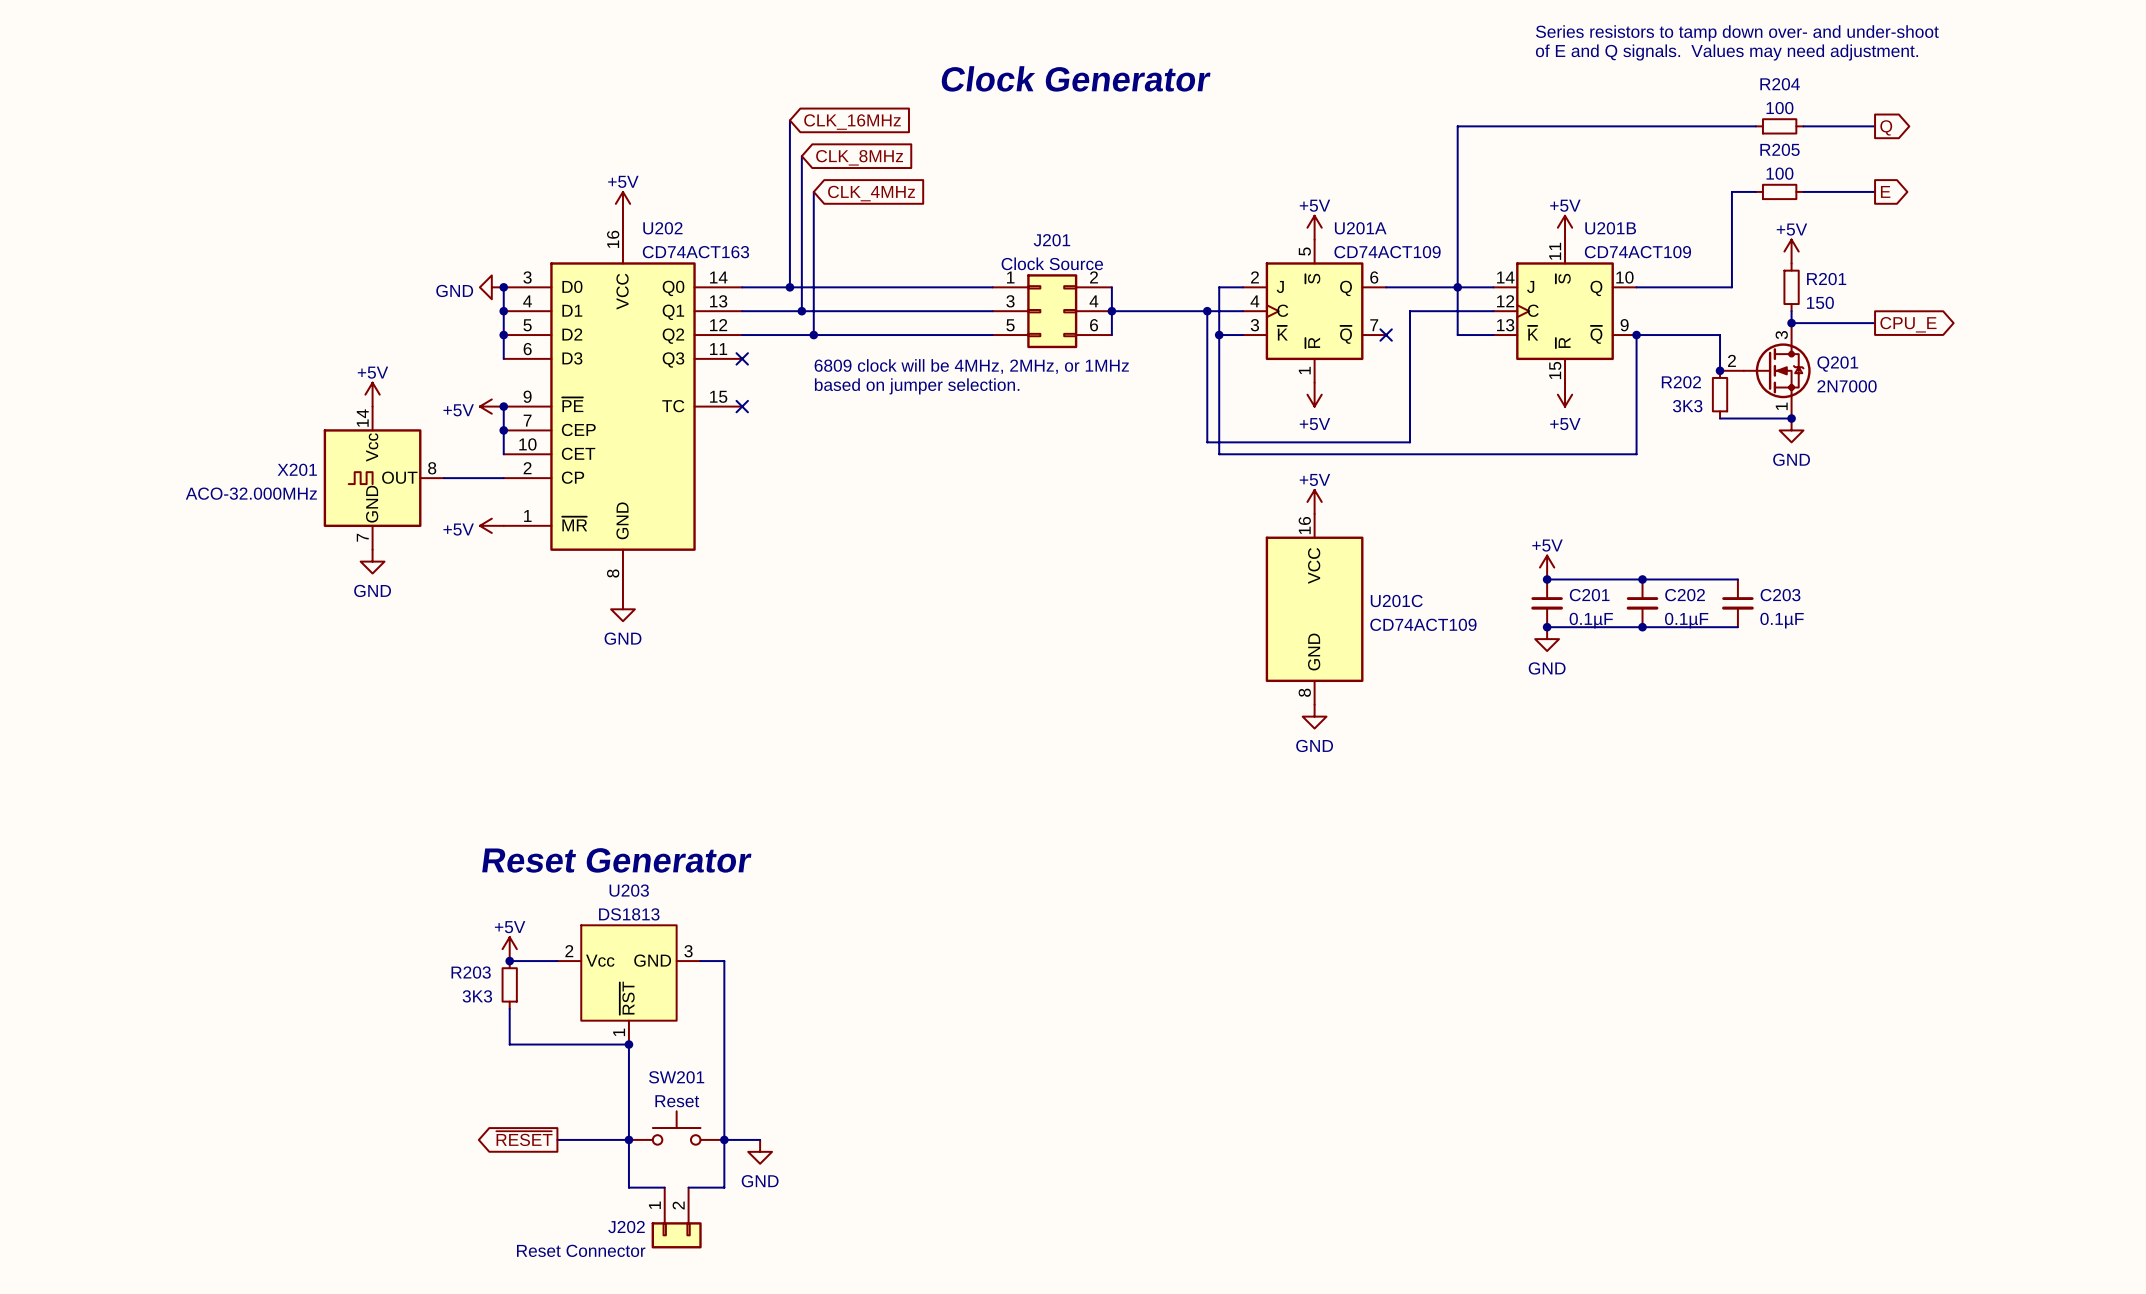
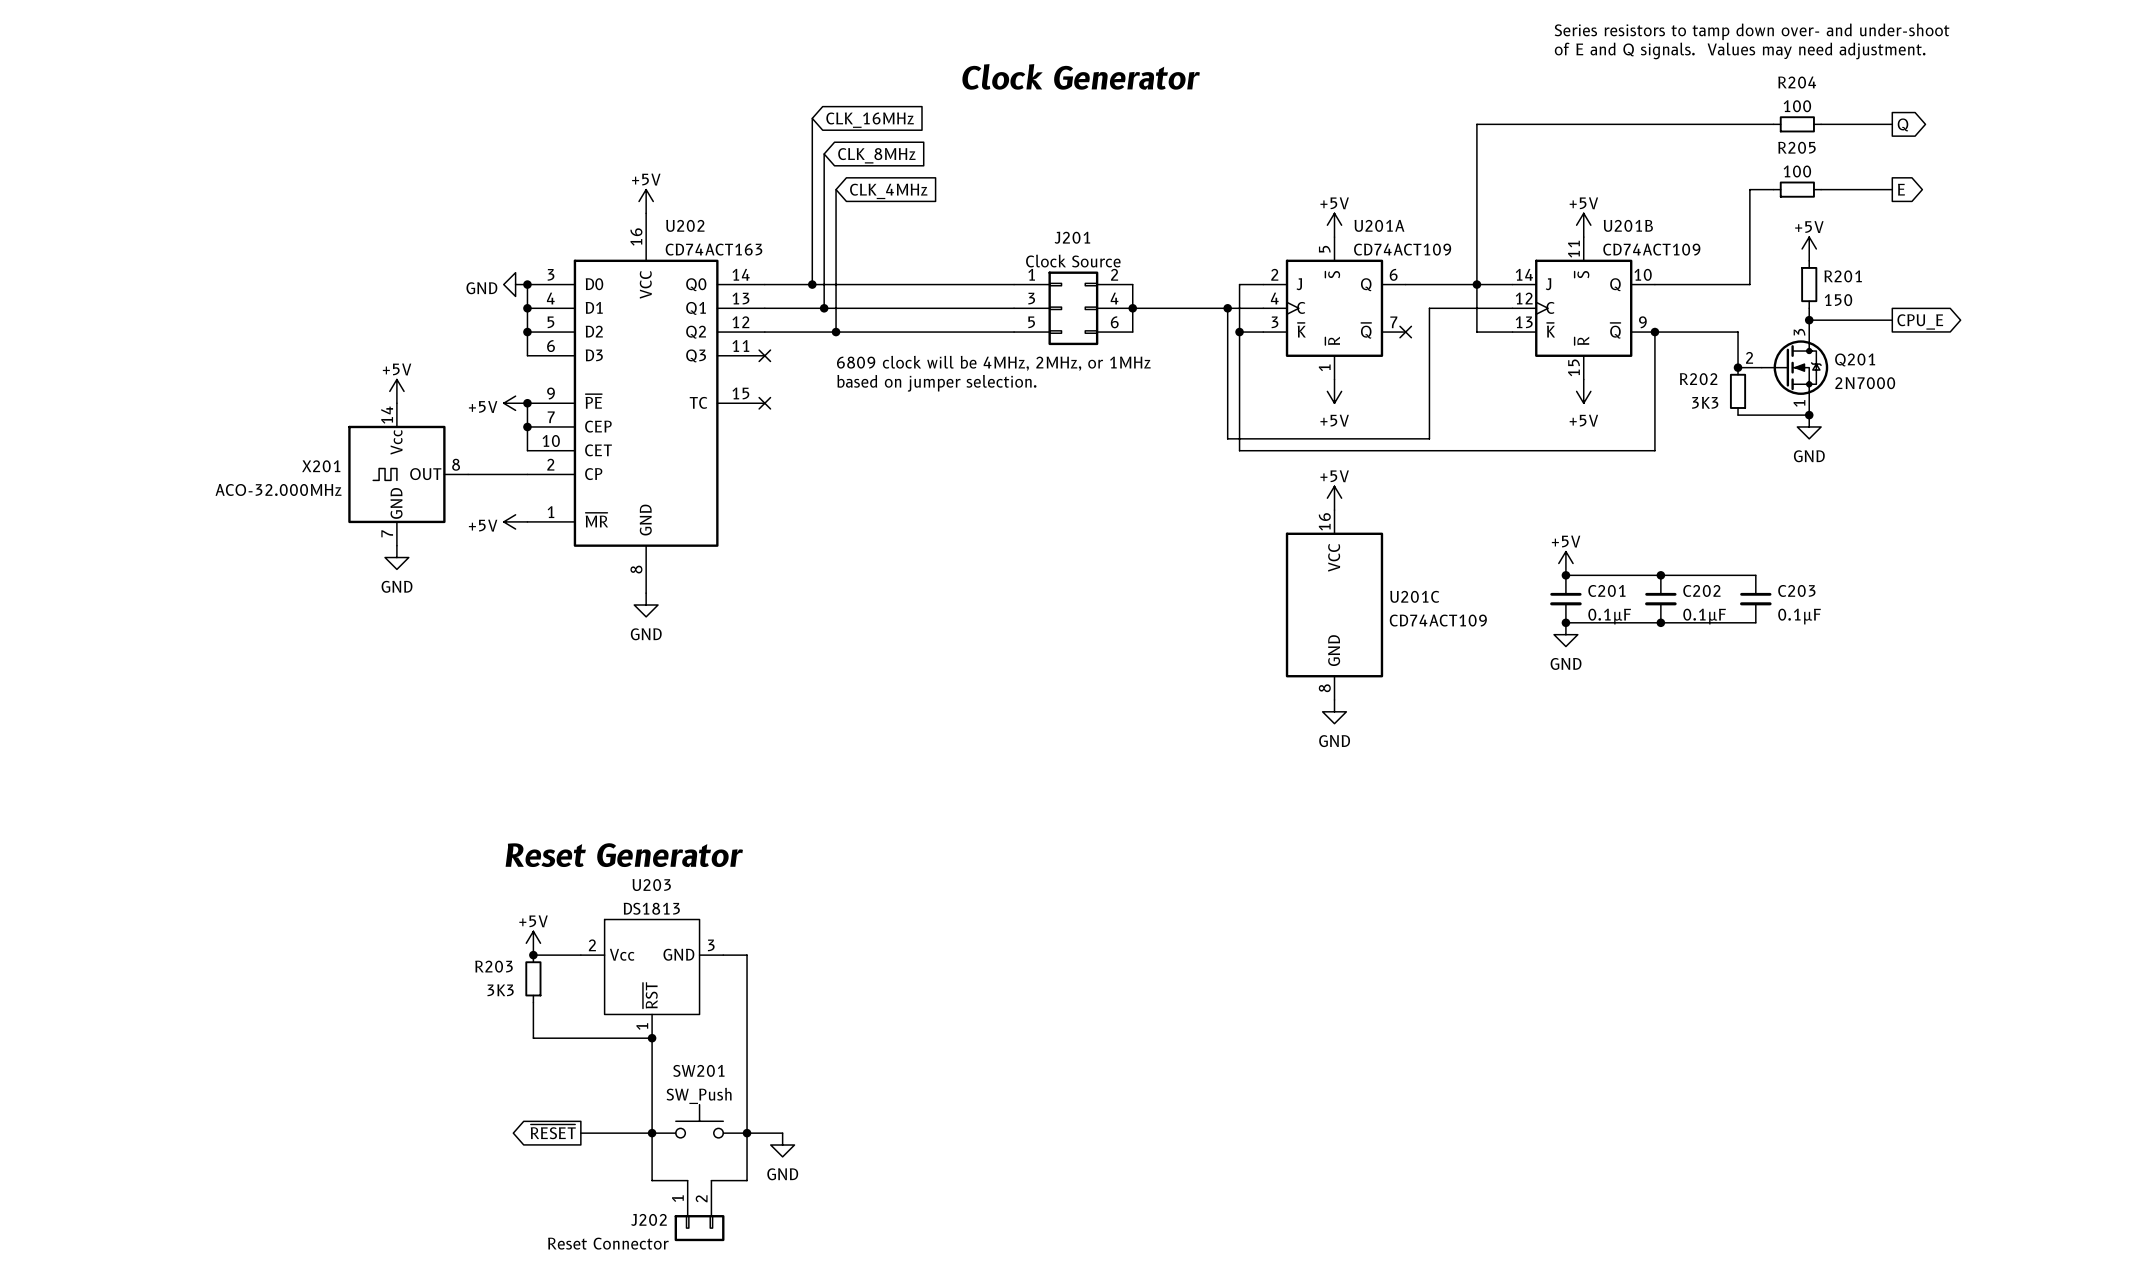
SW201 value: Reset (677, 1101) -> SW_Push (699, 1095)

